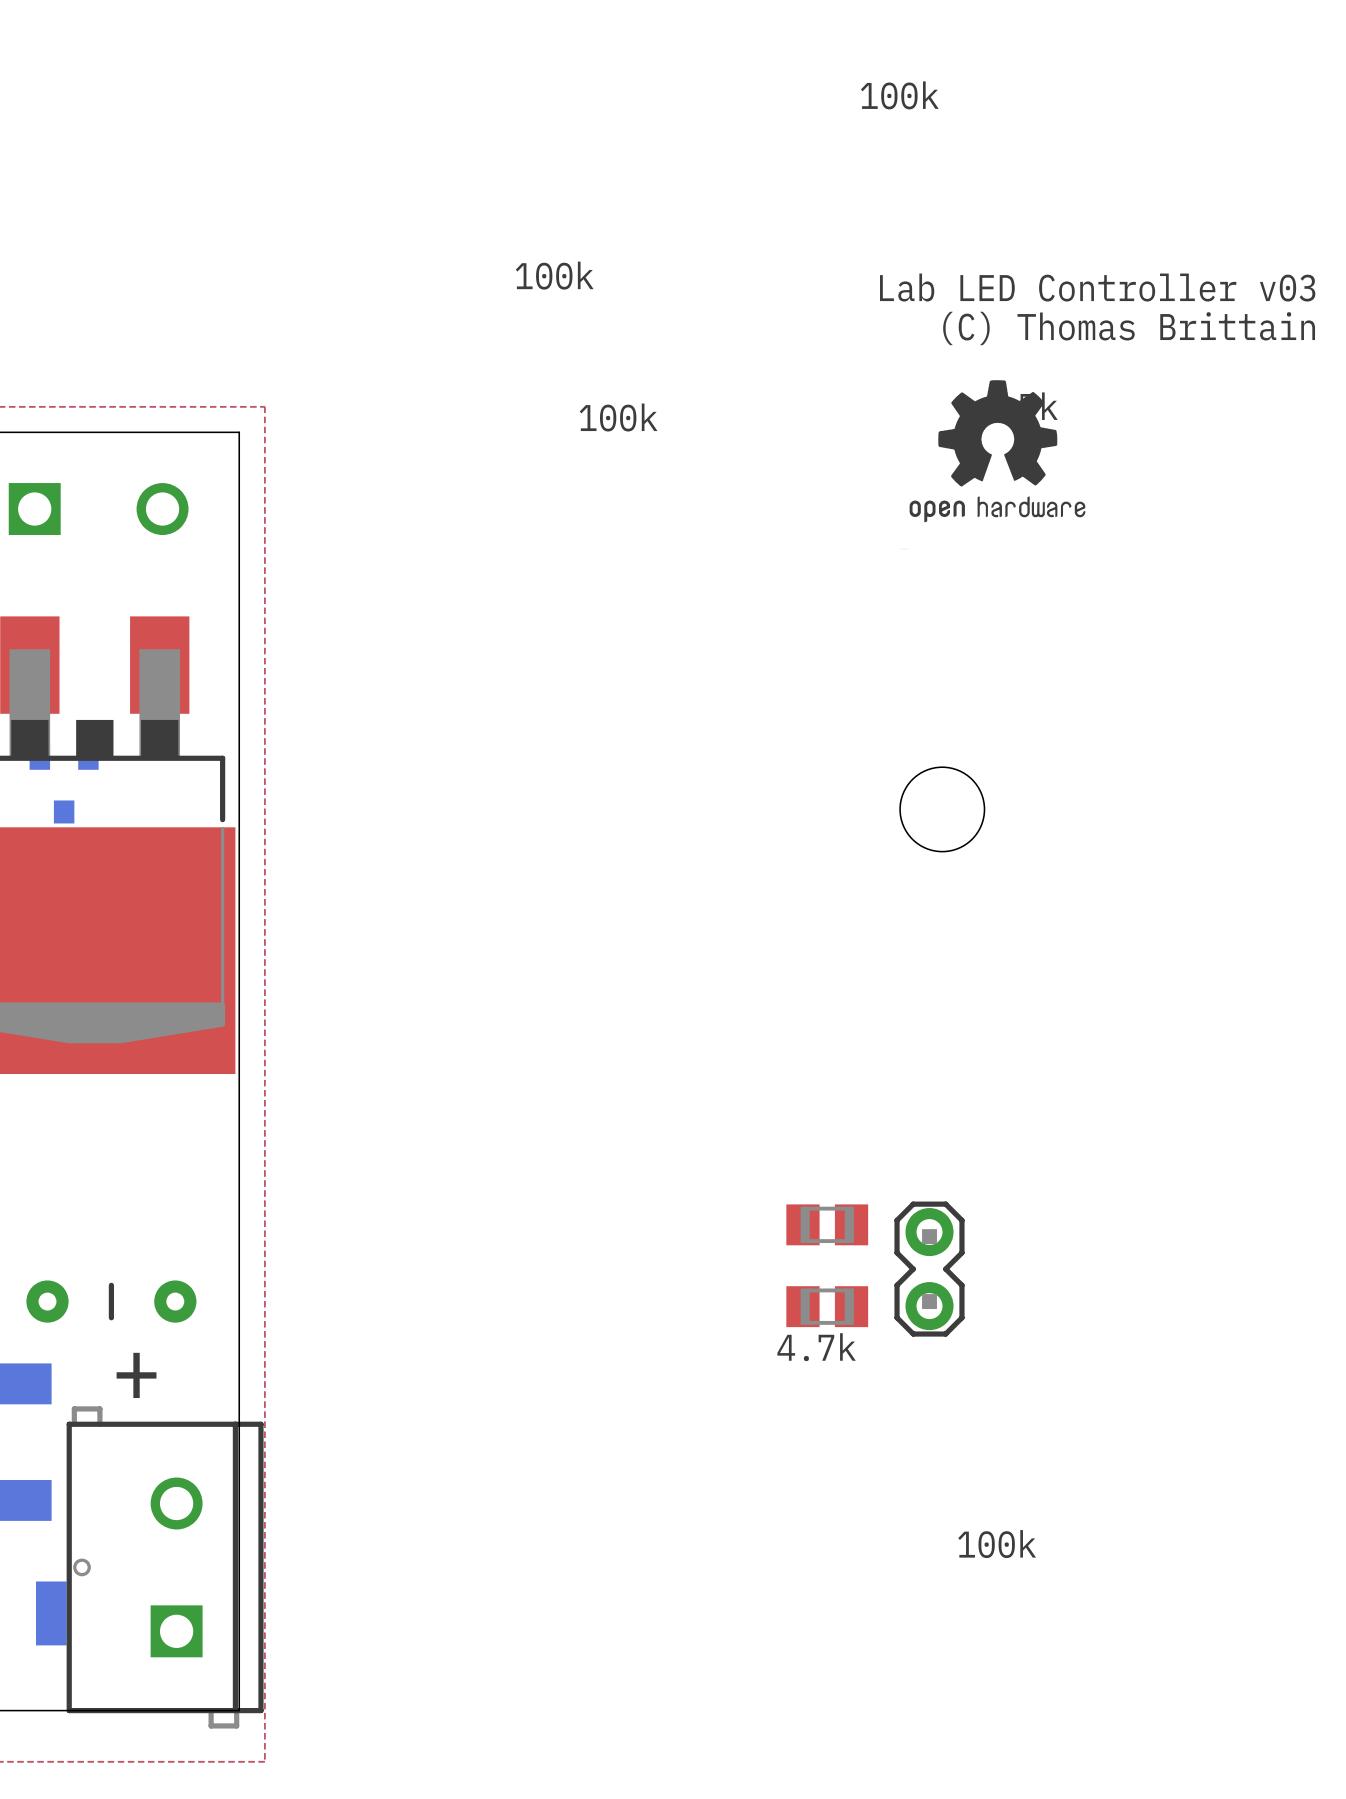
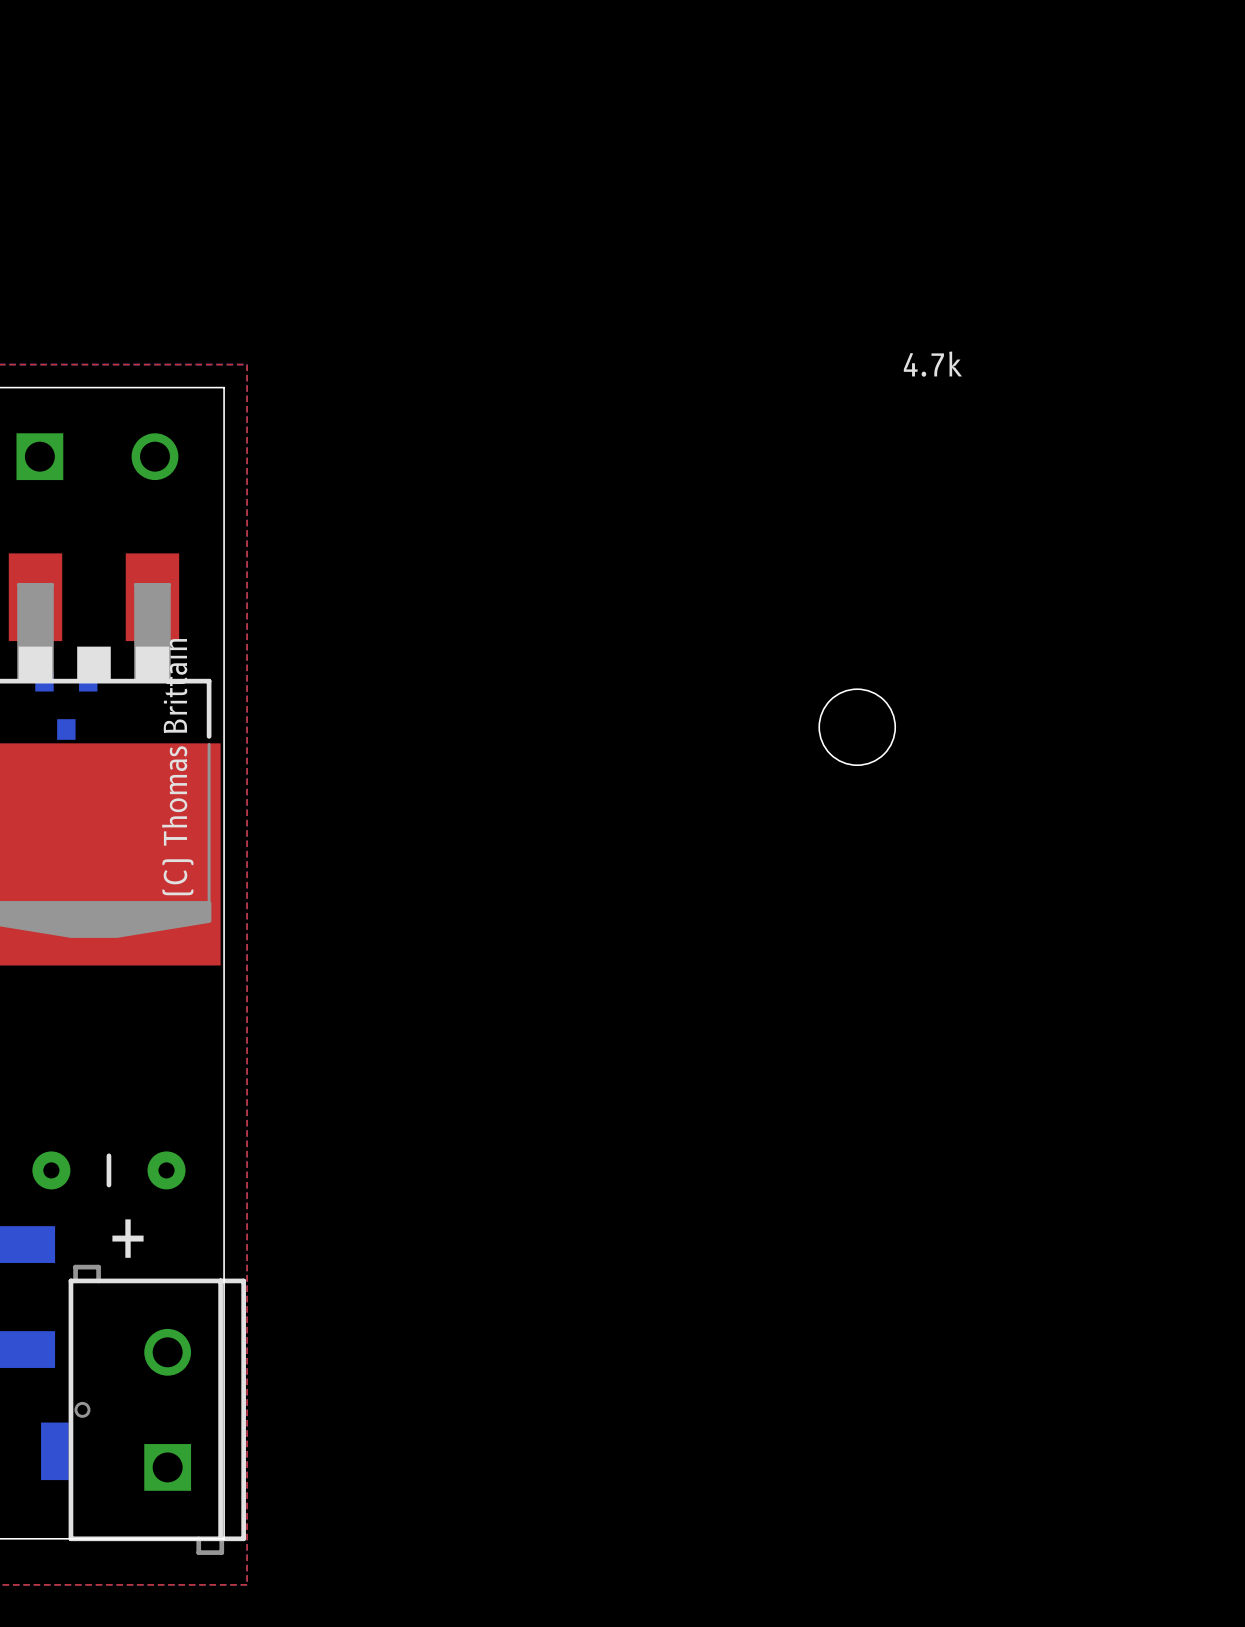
text: 100k (899, 95) -> none
text: 100k (554, 275) -> none
text: Lab LED Controller v03 (1097, 287) -> none
text: (C) Thomas Brittain (1129, 328) -> none
drawing: [909, 380, 1086, 523] -> none
text: 100k (618, 417) -> none
text: none -> (C) Thomas Brittain (177, 767)
part: (827, 1224) -> none
part: (929, 1269) -> none
part: (827, 1306) -> none
text: 4.7k (816, 1347) -> none
text: 100k (997, 1544) -> none

